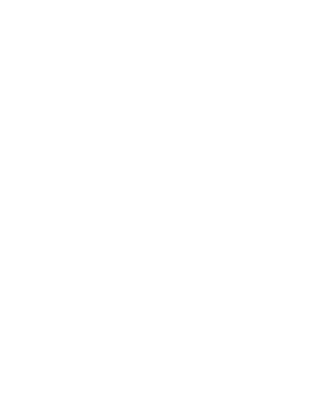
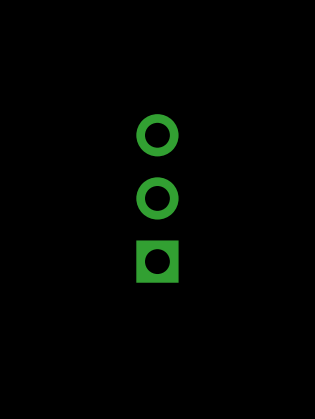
part: none -> (157, 198)

